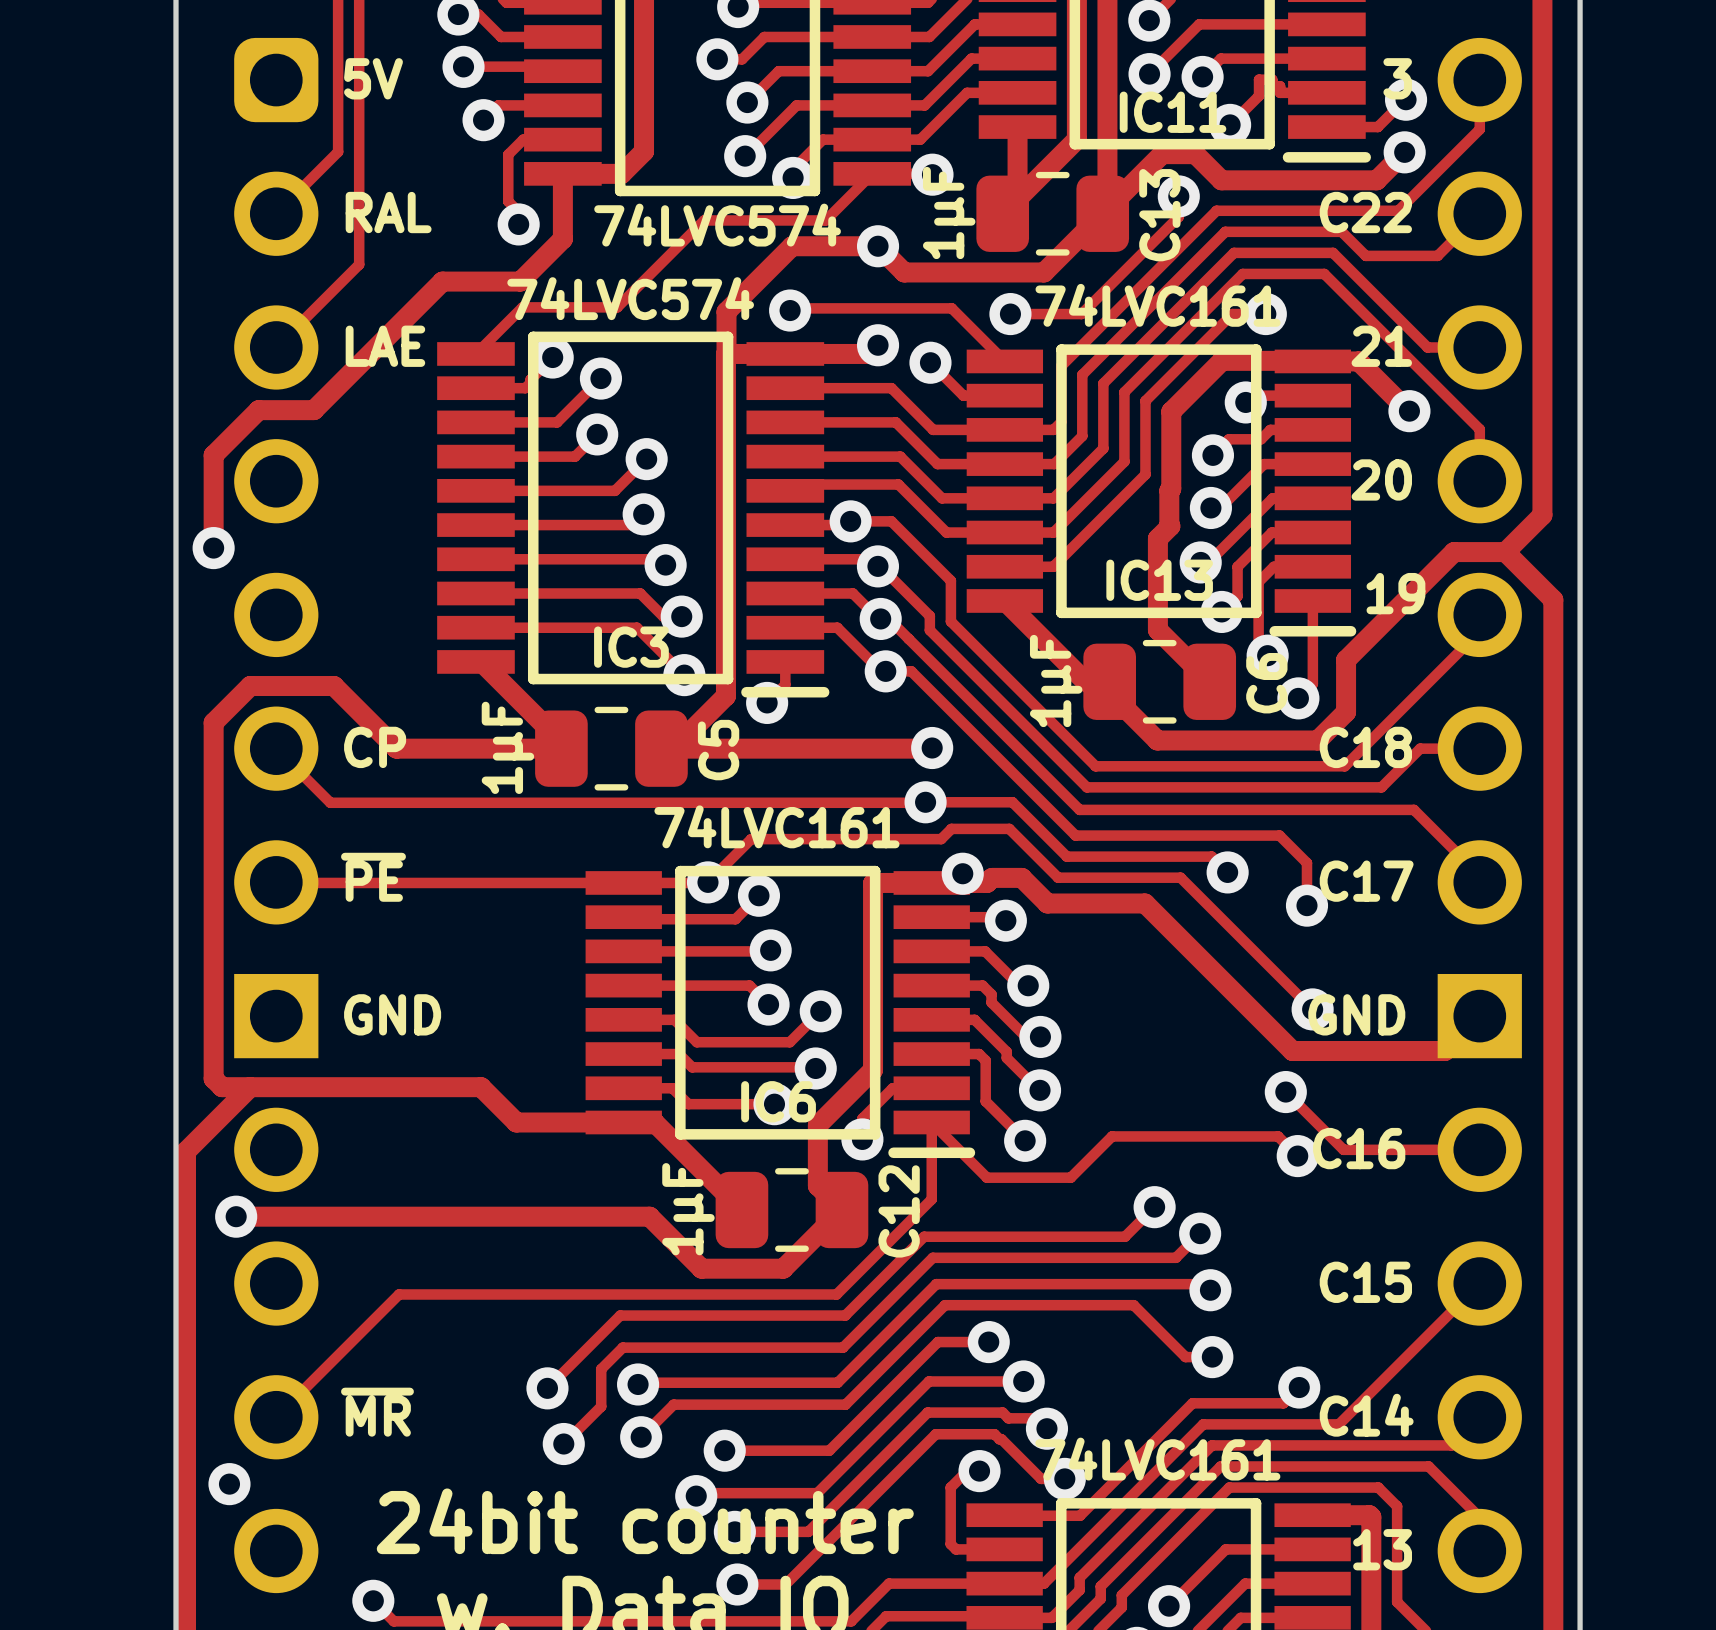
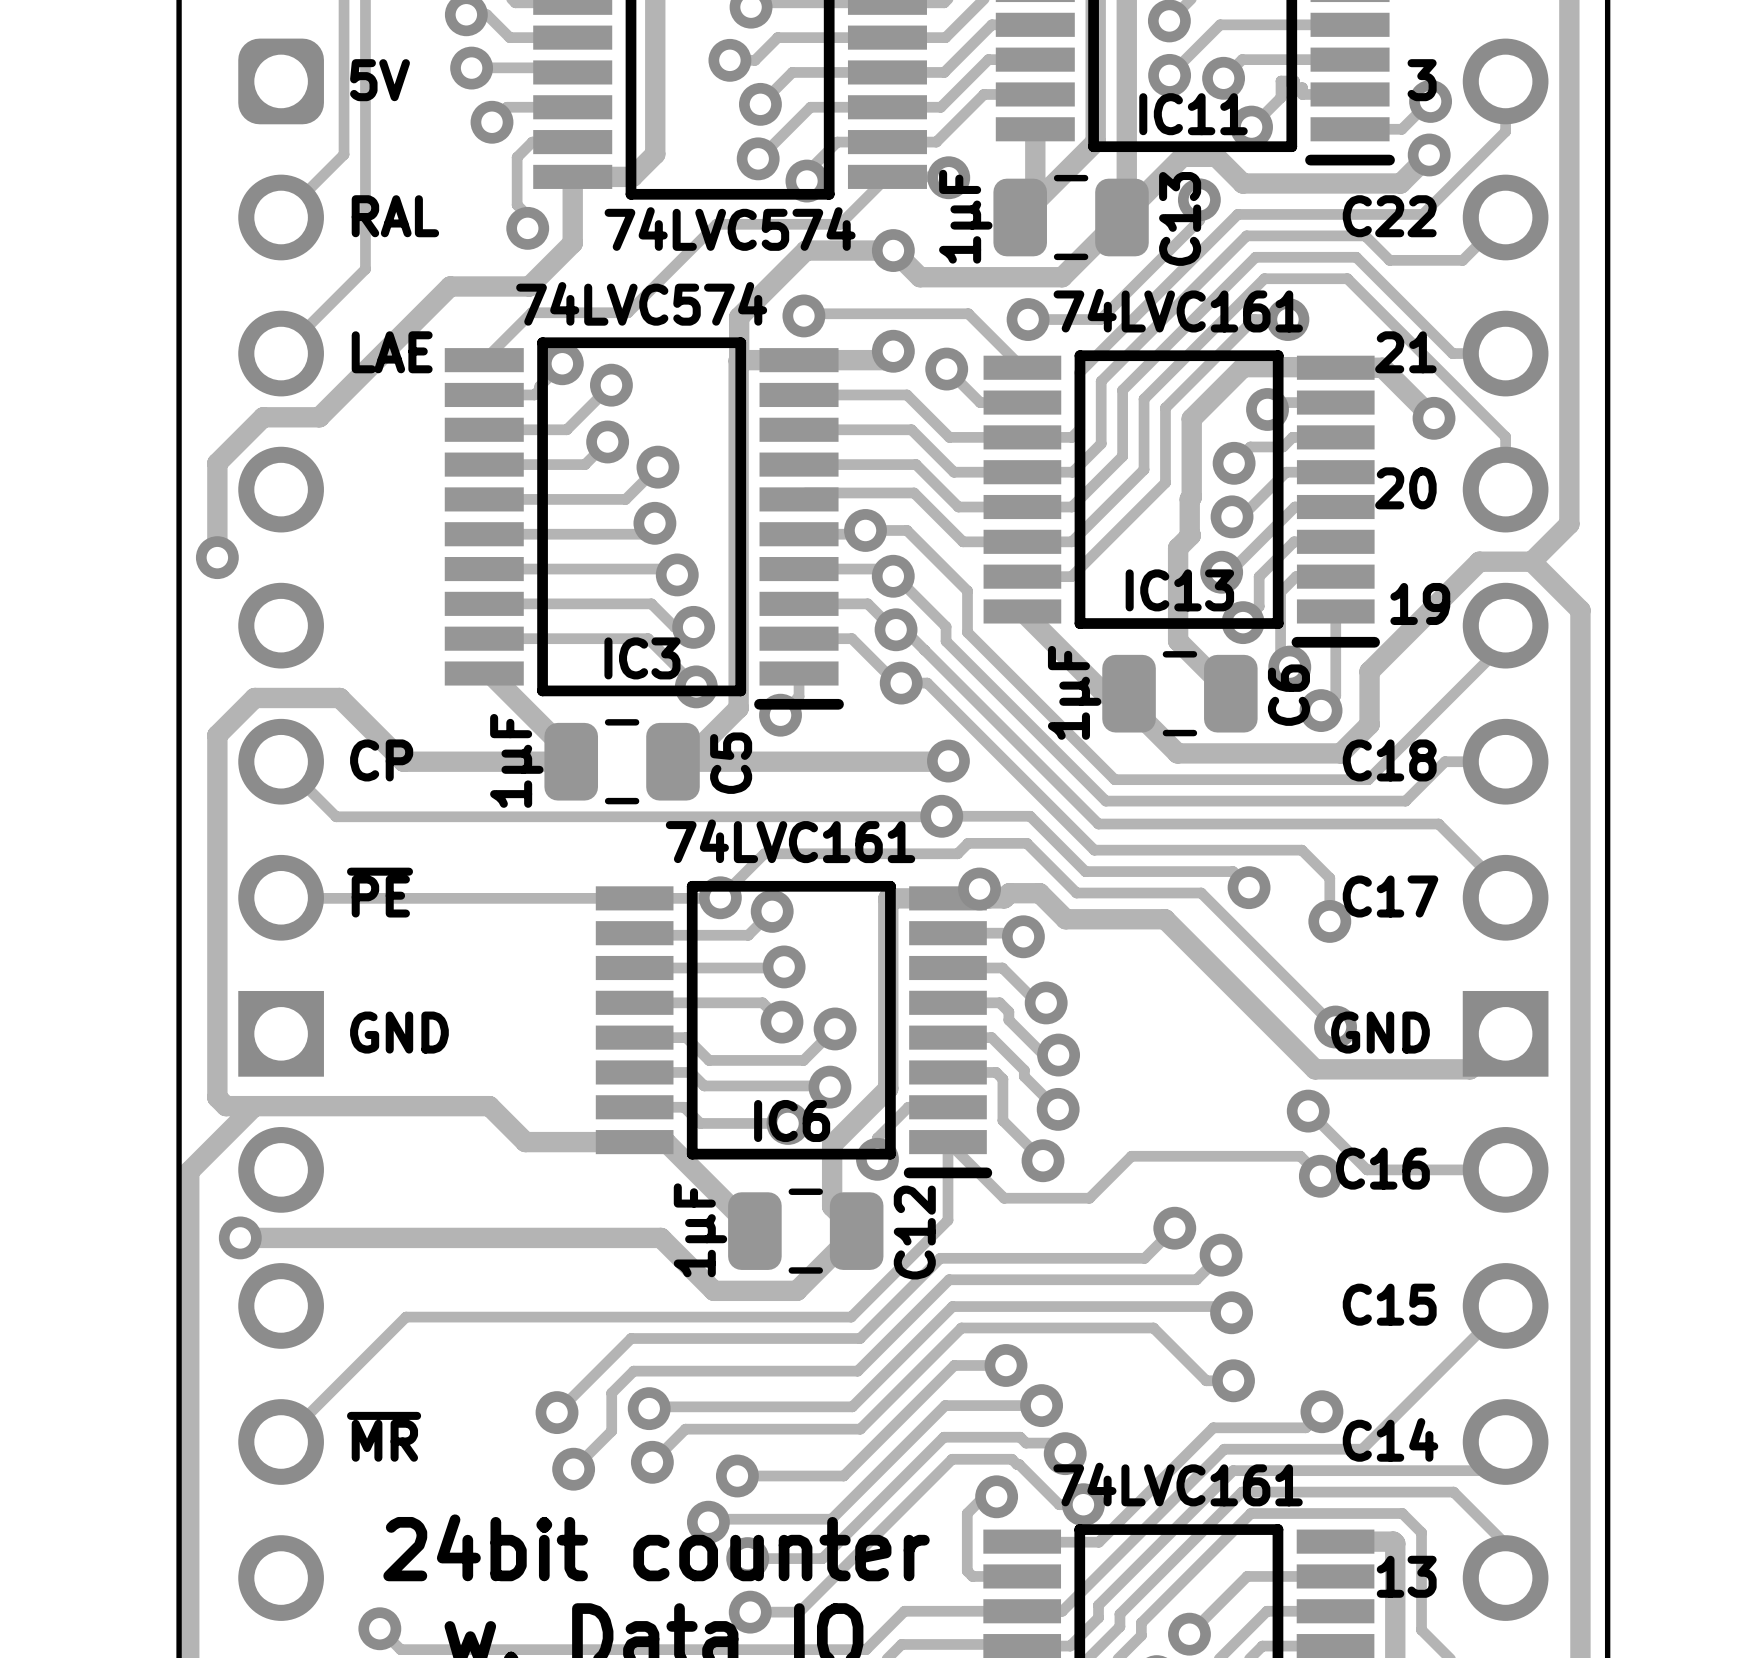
via: (229, 1484) -> none

